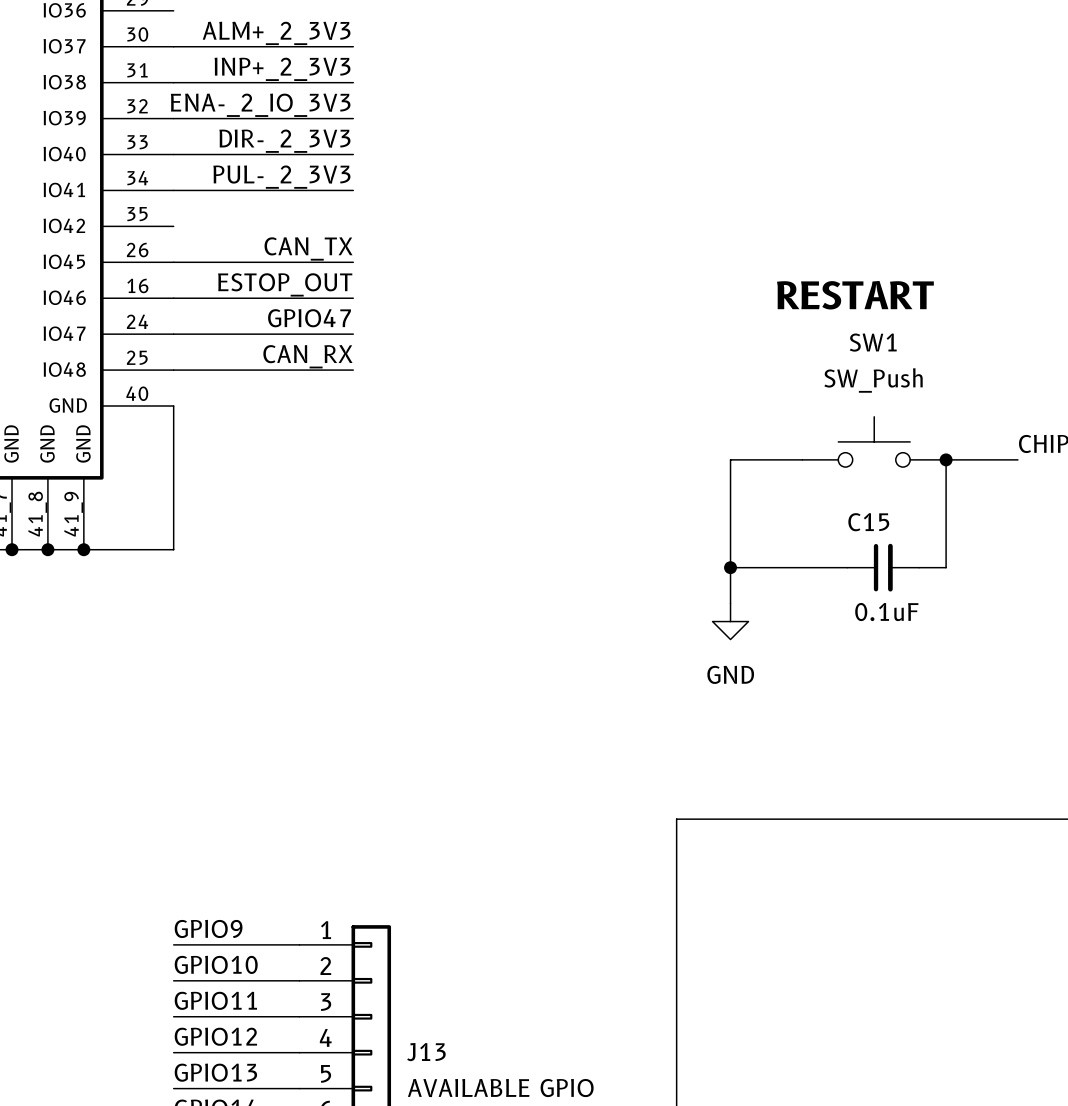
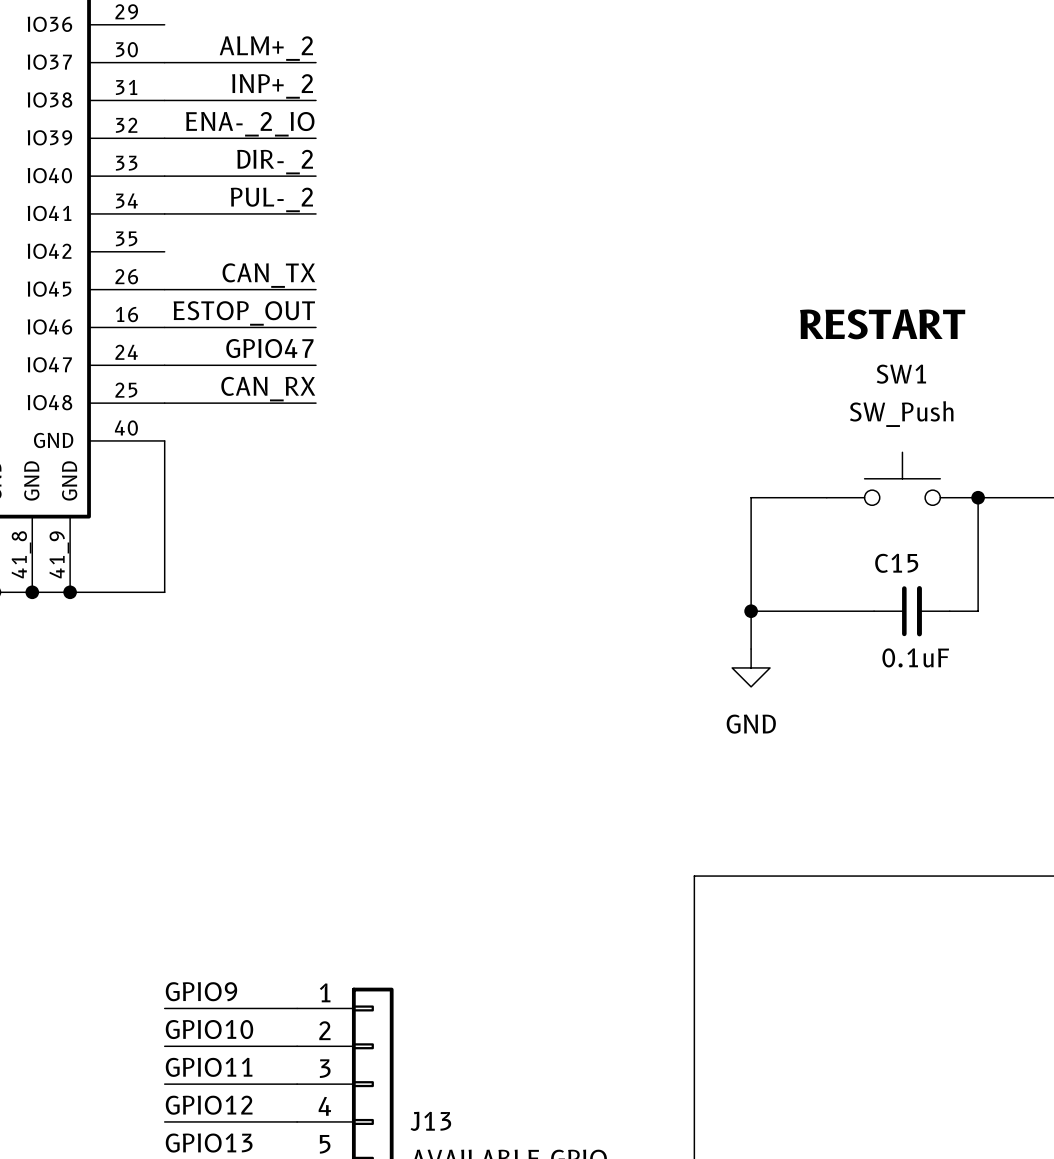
label: ALM+_2_3V3 (276, 33) -> ALM+_2 (266, 48)
wire: (317, 46) (353, 46) -> none
label: INP+_2_3V3 (282, 69) -> INP+_2 (272, 86)
wire: (317, 82) (353, 82) -> none
label: ENA-_2_IO_3V3 (260, 105) -> ENA-_2_IO (250, 124)
wire: (317, 118) (353, 118) -> none
label: DIR-_2_3V3 (284, 141) -> DIR-_2 (275, 162)
wire: (317, 154) (353, 154) -> none
label: PUL-_2_3V3 (281, 177) -> PUL-_2 (271, 199)
wire: (317, 190) (353, 190) -> none
label position: CAN_TX (308, 248) -> CAN_TX (268, 275)
wire: (317, 262) (353, 262) -> none
label position: ESTOP_OUT (285, 284) -> ESTOP_OUT (244, 313)
wire: (317, 298) (353, 298) -> none
label position: GPIO47 (309, 318) -> GPIO47 (269, 348)
wire: (317, 334) (353, 334) -> none
label position: CAN_RX (307, 356) -> CAN_RX (268, 389)
wire: (317, 370) (353, 370) -> none

